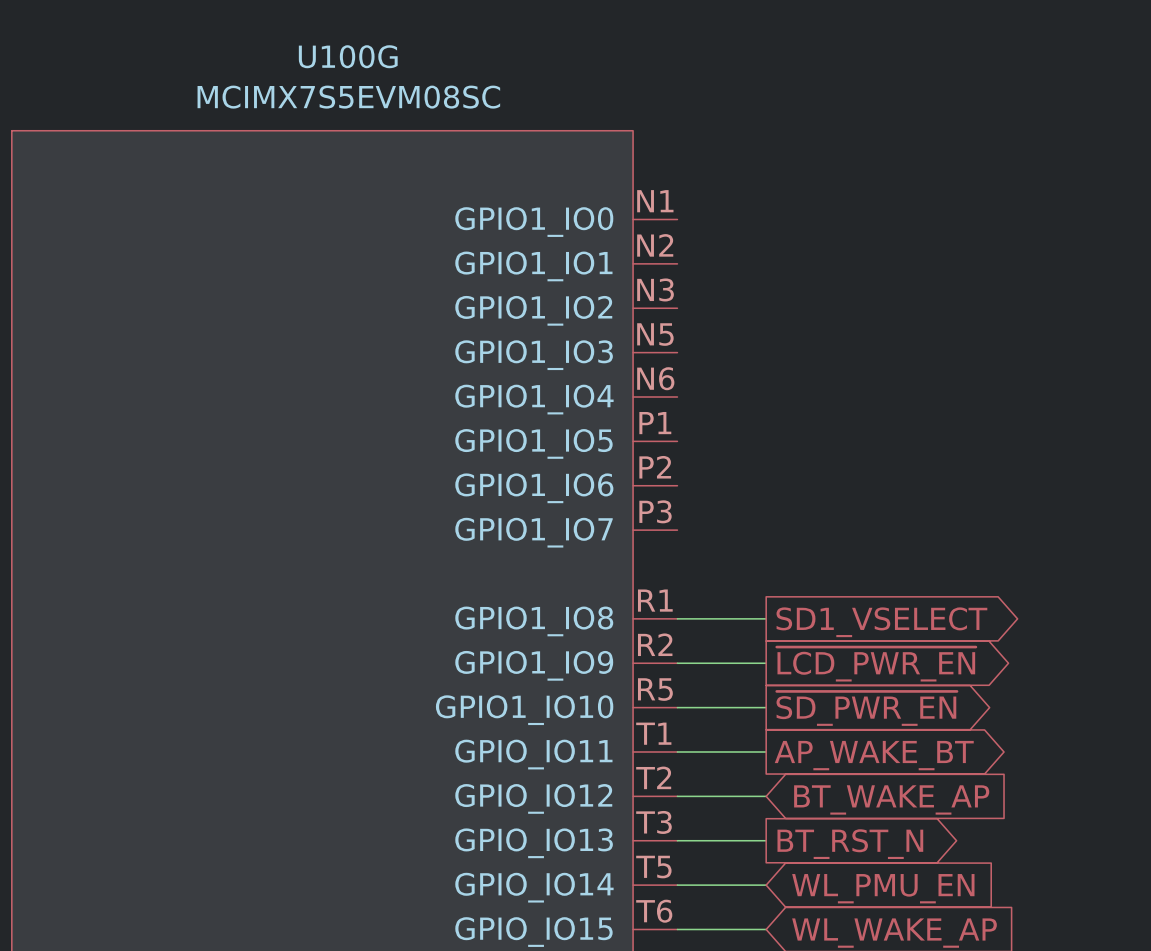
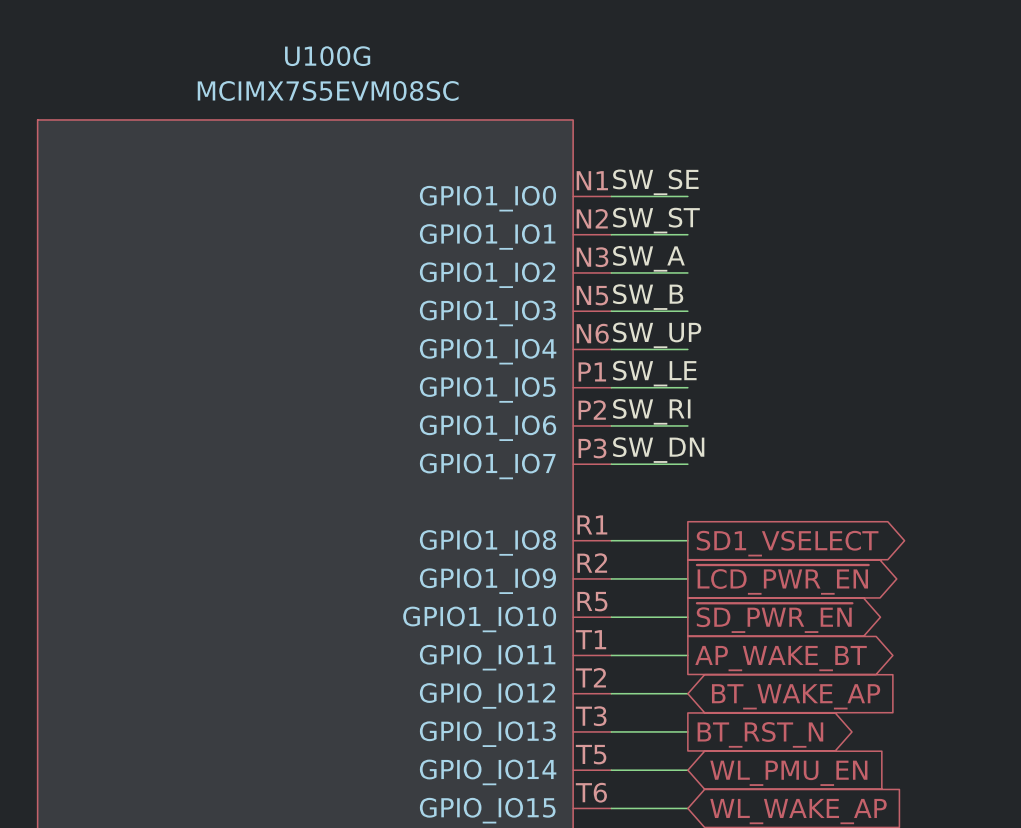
label: none -> SW_SE (655, 182)
wire: none -> (611, 196) (687, 196)
label: none -> SW_ST (656, 220)
wire: none -> (611, 234) (687, 234)
label: none -> SW_A (648, 258)
wire: none -> (611, 272) (687, 272)
label: none -> SW_B (648, 297)
wire: none -> (611, 311) (687, 311)
label: none -> SW_UP (657, 335)
wire: none -> (611, 349) (687, 349)
label: none -> SW_LE (654, 373)
wire: none -> (611, 387) (687, 387)
label: none -> SW_RI (651, 411)
wire: none -> (611, 425) (687, 425)
label: none -> SW_DN (658, 450)
wire: none -> (611, 464) (687, 464)

